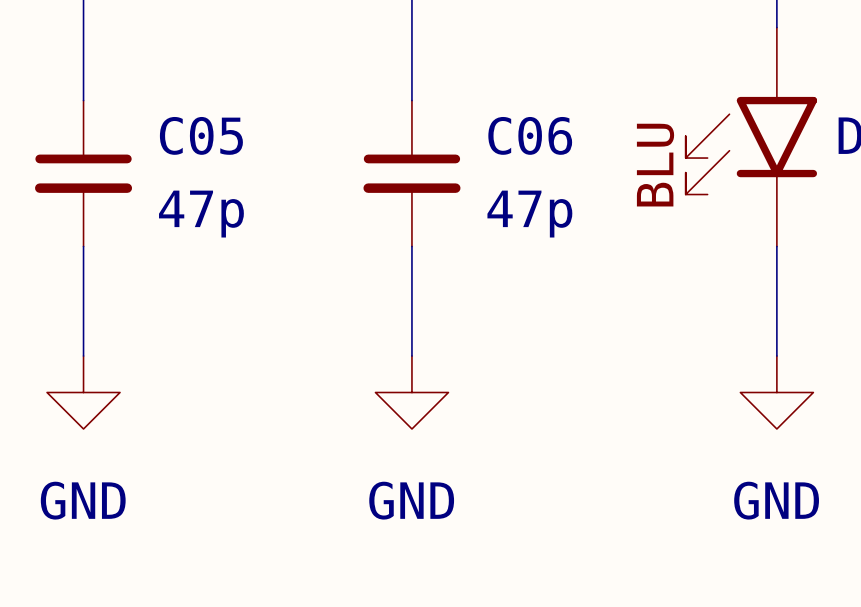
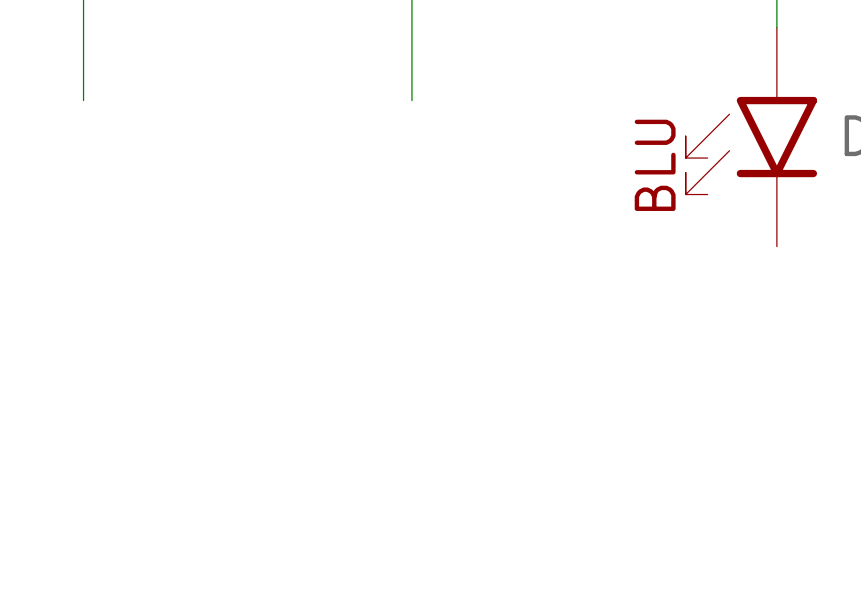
C05: 47p (83, 173) -> none
C06: 47p (411, 173) -> none
wire: (83, 246) (83, 356) -> none
wire: (411, 246) (411, 356) -> none
wire: (776, 246) (776, 356) -> none
power symbol: GND (83, 392) -> none
power symbol: GND (411, 392) -> none
power symbol: GND (776, 392) -> none

